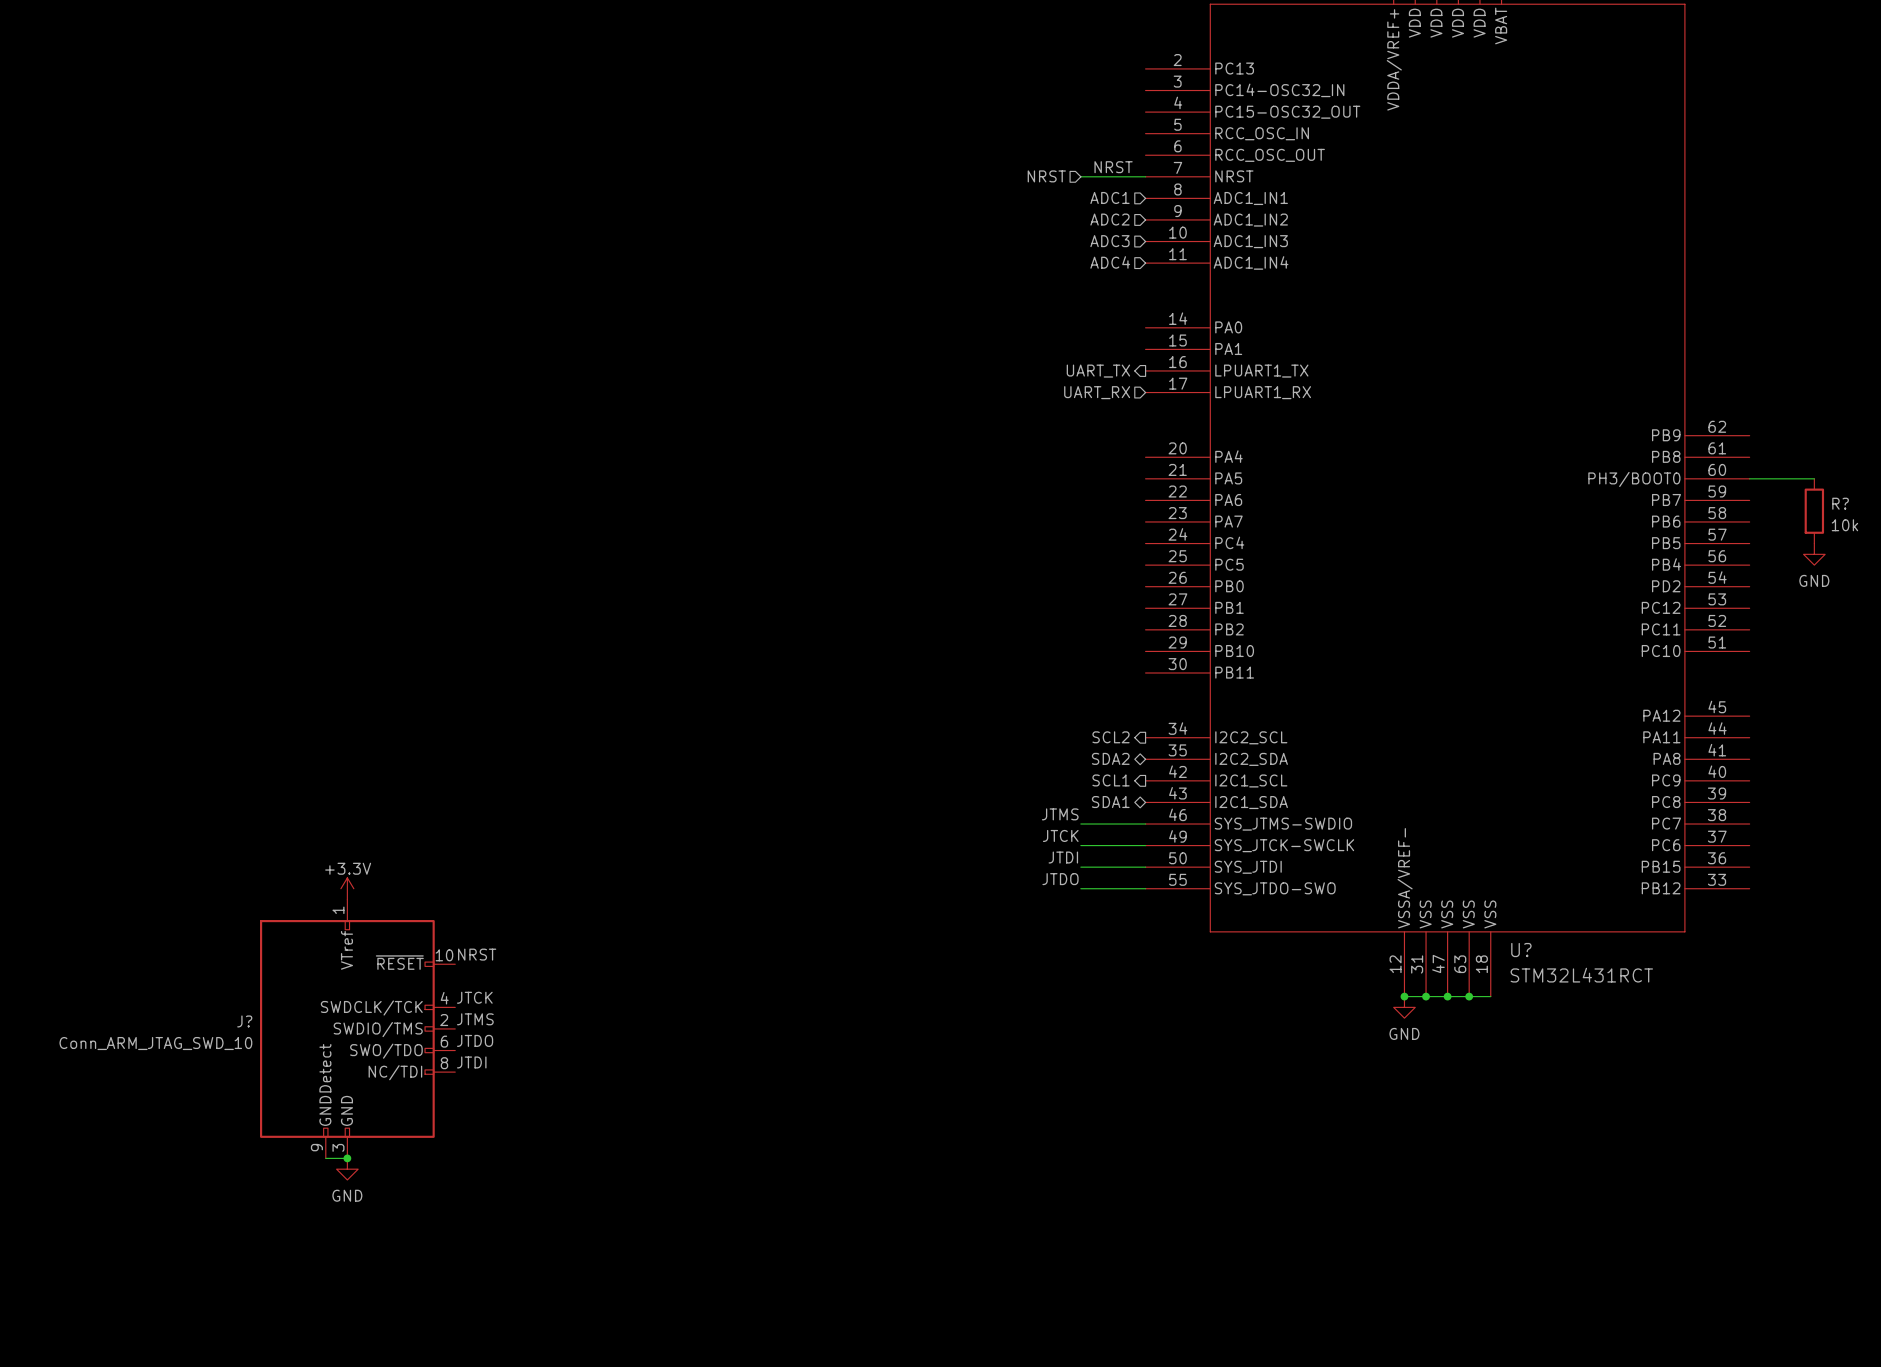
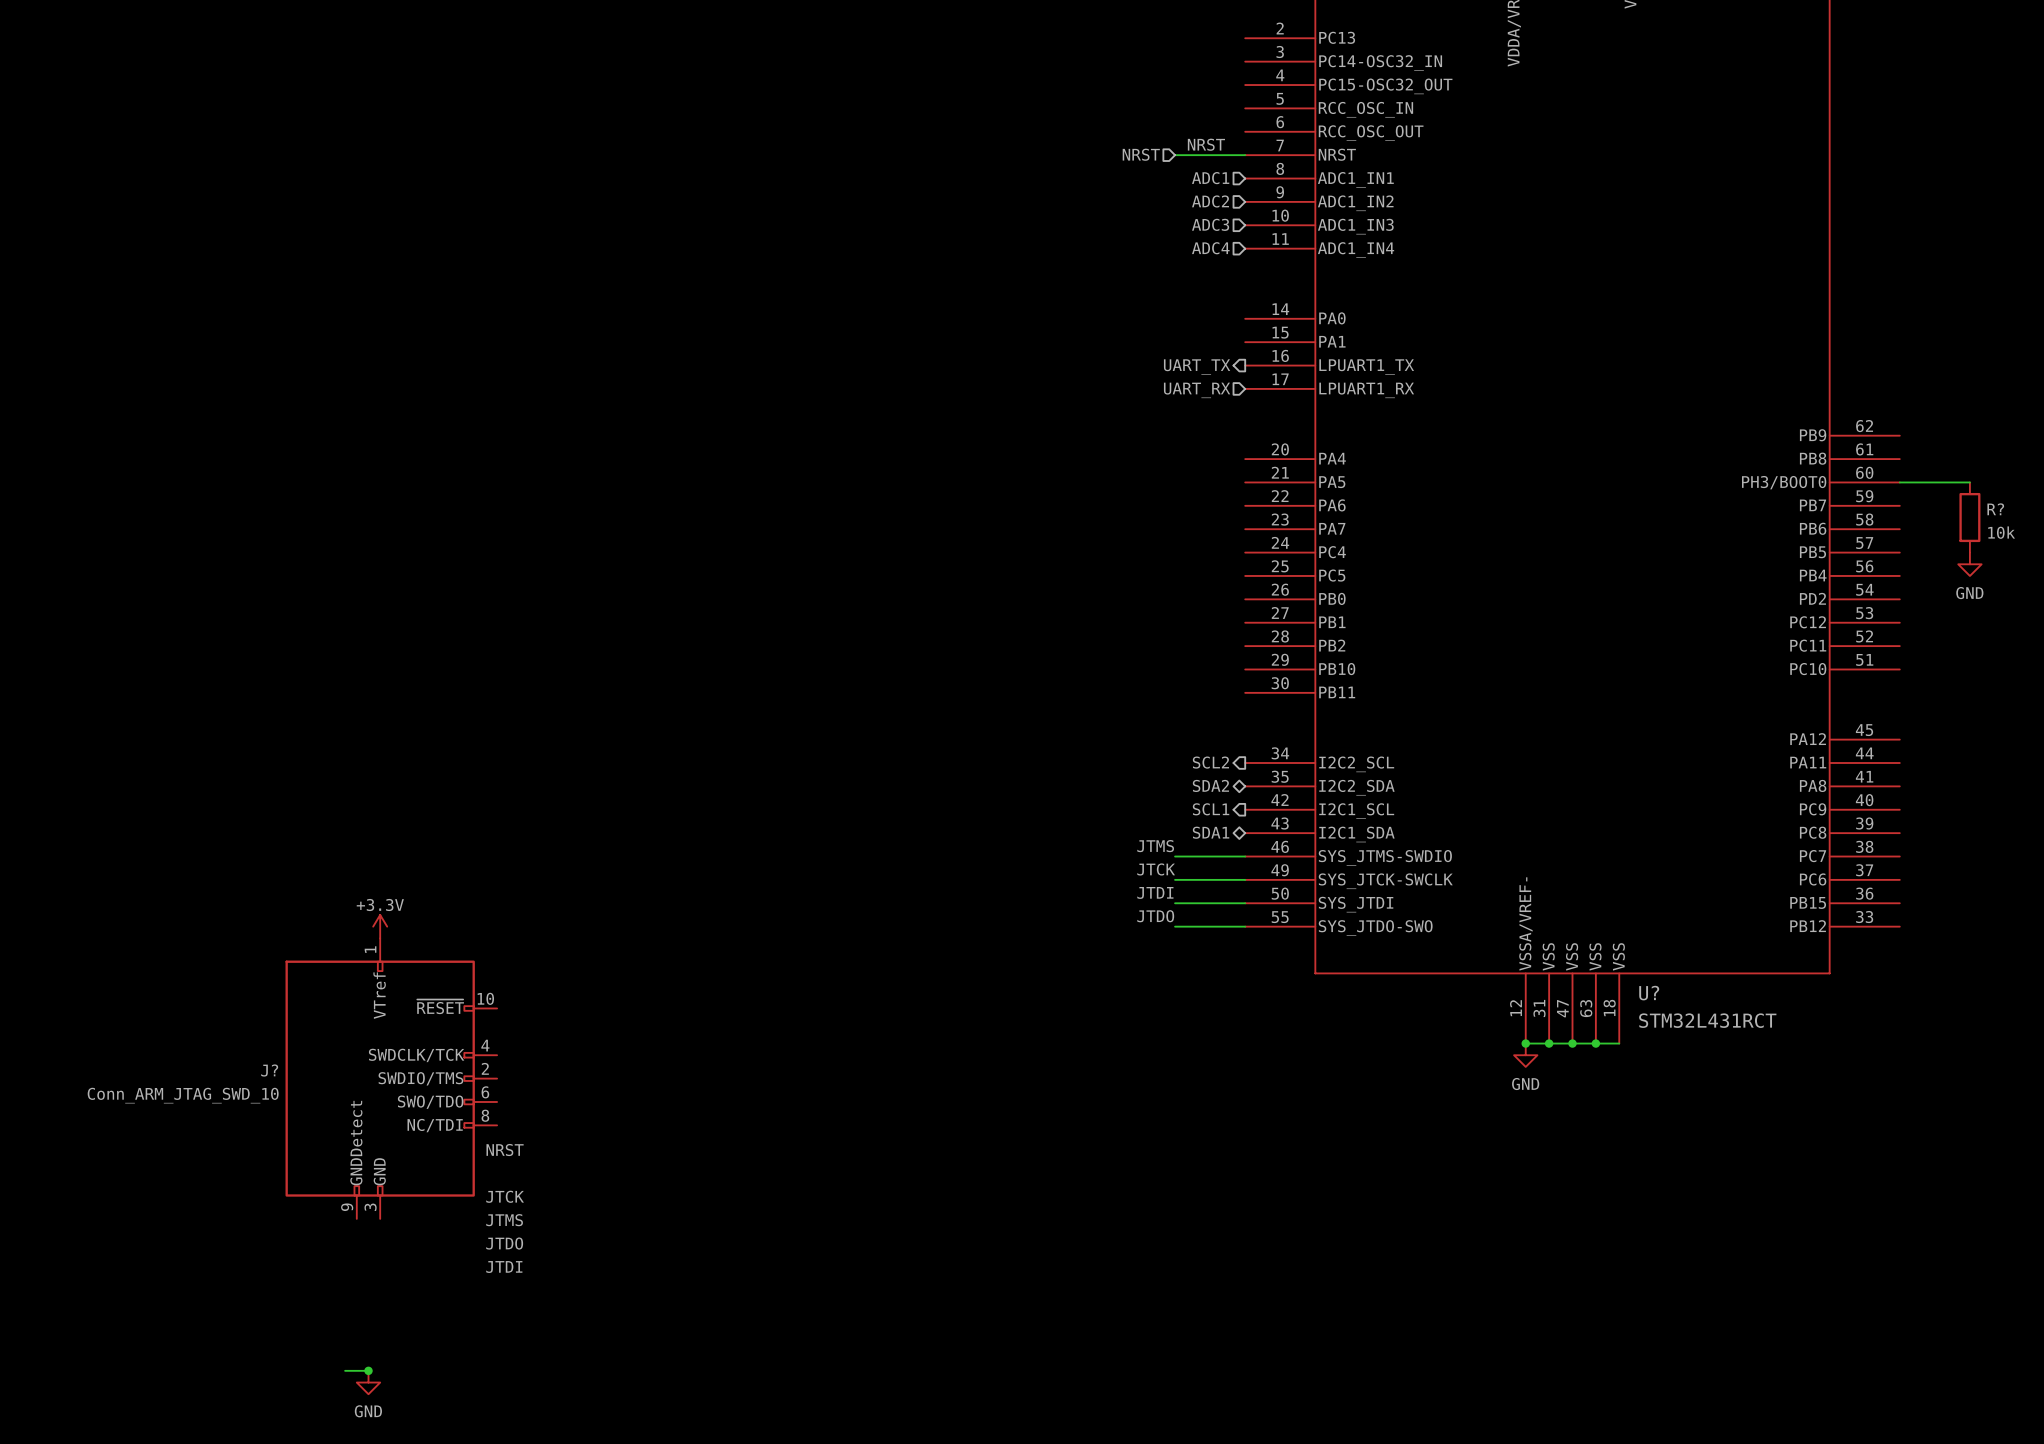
label position: NRST (477, 954) -> NRST (505, 1150)
label position: JTCK (474, 997) -> JTCK (505, 1196)
label position: JTMS (475, 1019) -> JTMS (504, 1220)
label position: JTDO (475, 1040) -> JTDO (504, 1243)
label position: JTDI (471, 1062) -> JTDI (504, 1267)
wire: (325, 1158) (347, 1158) -> (345, 1370) (368, 1370)
junction: (347, 1158) -> none
power symbol position: GND (347, 1169) -> GND (368, 1382)
junction: none -> (368, 1370)

